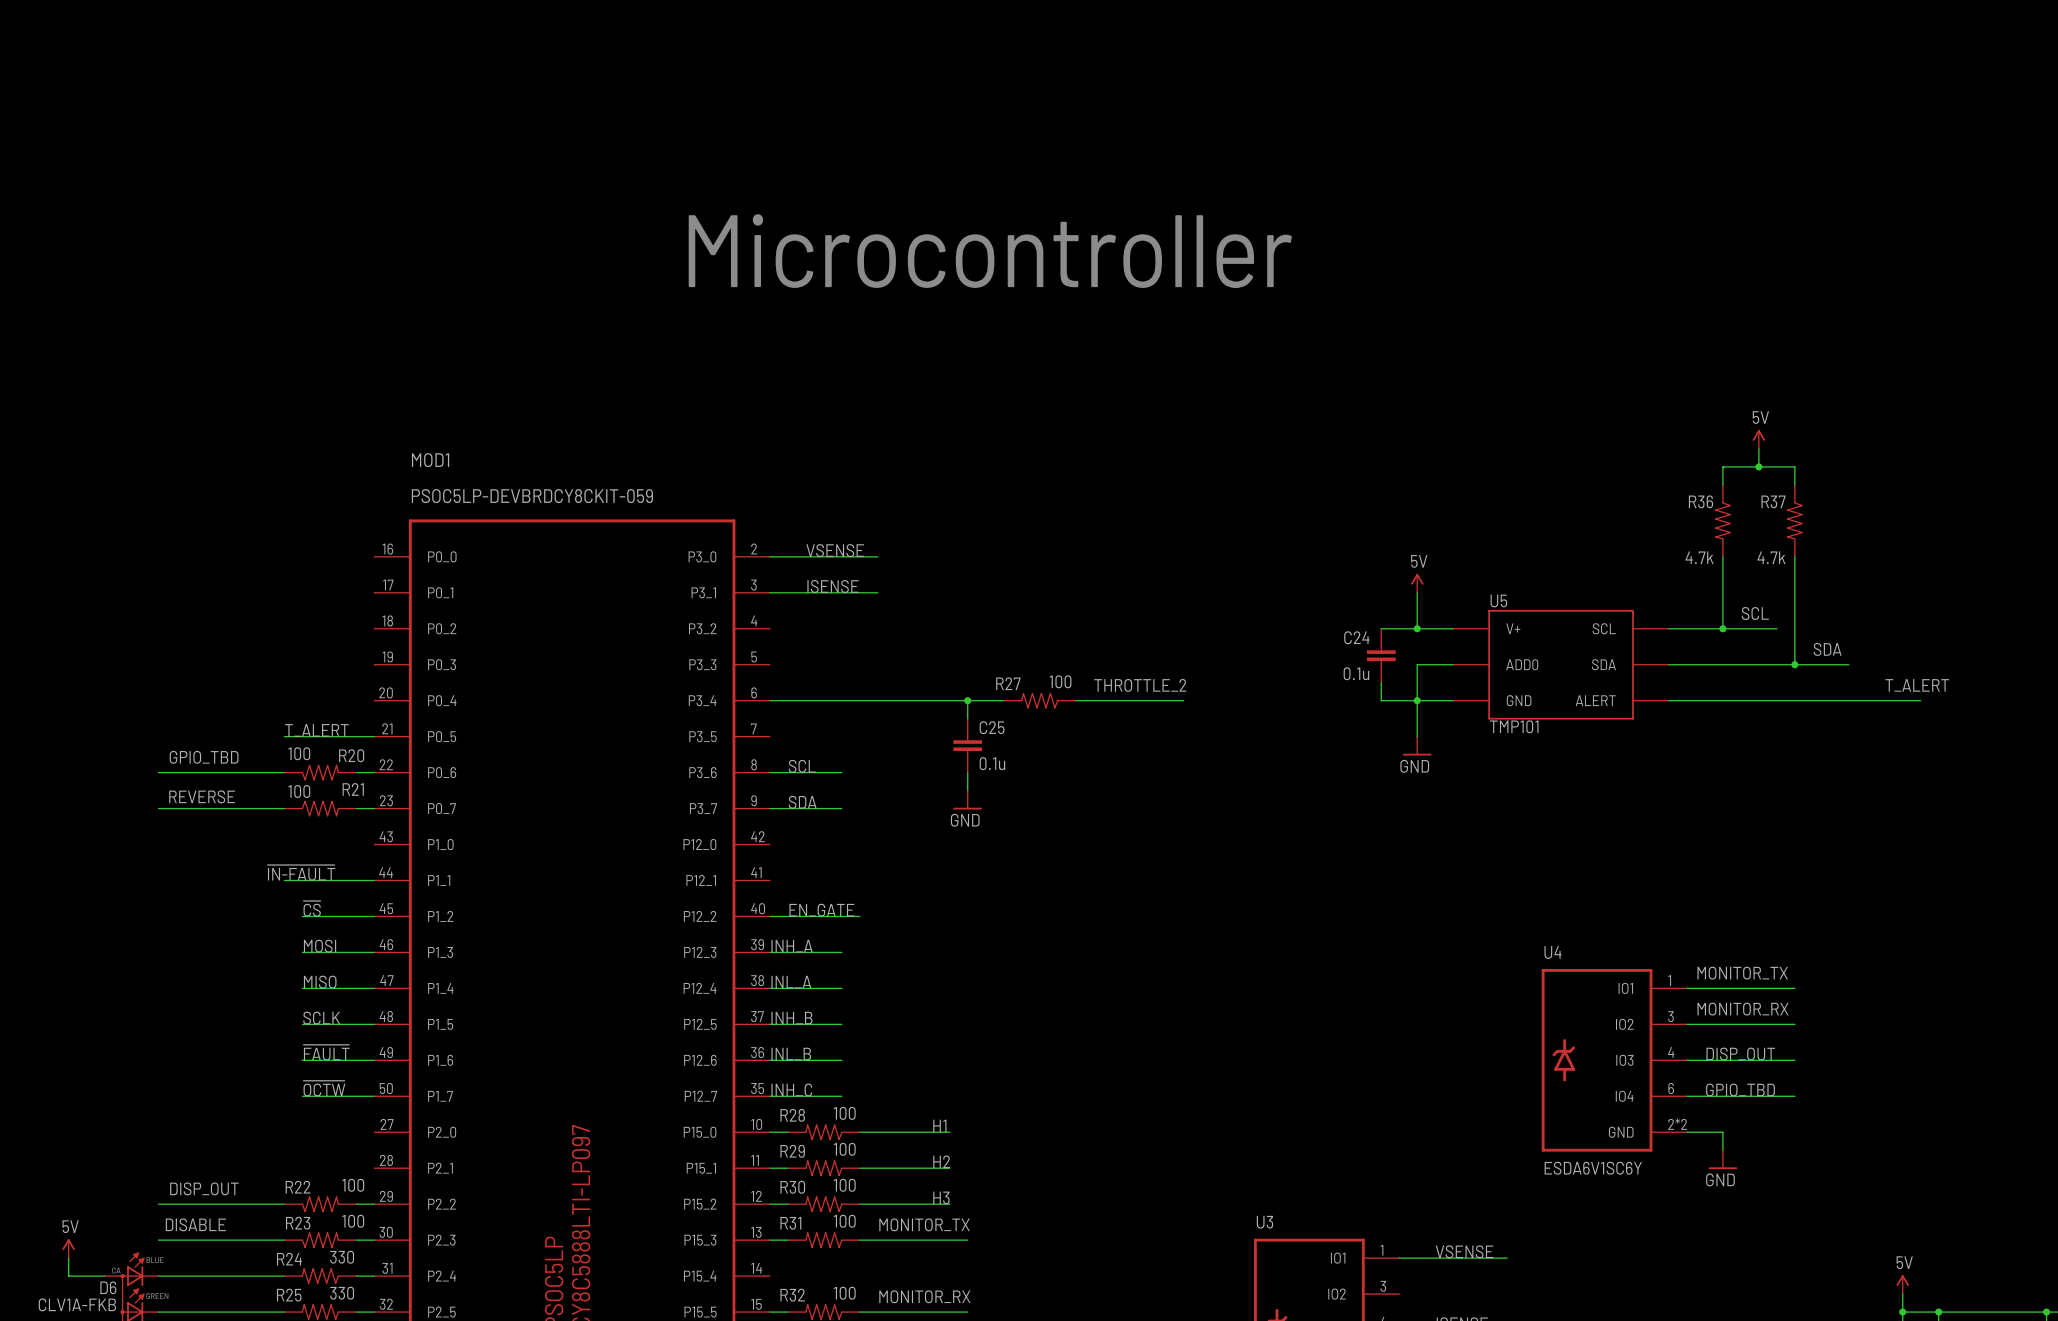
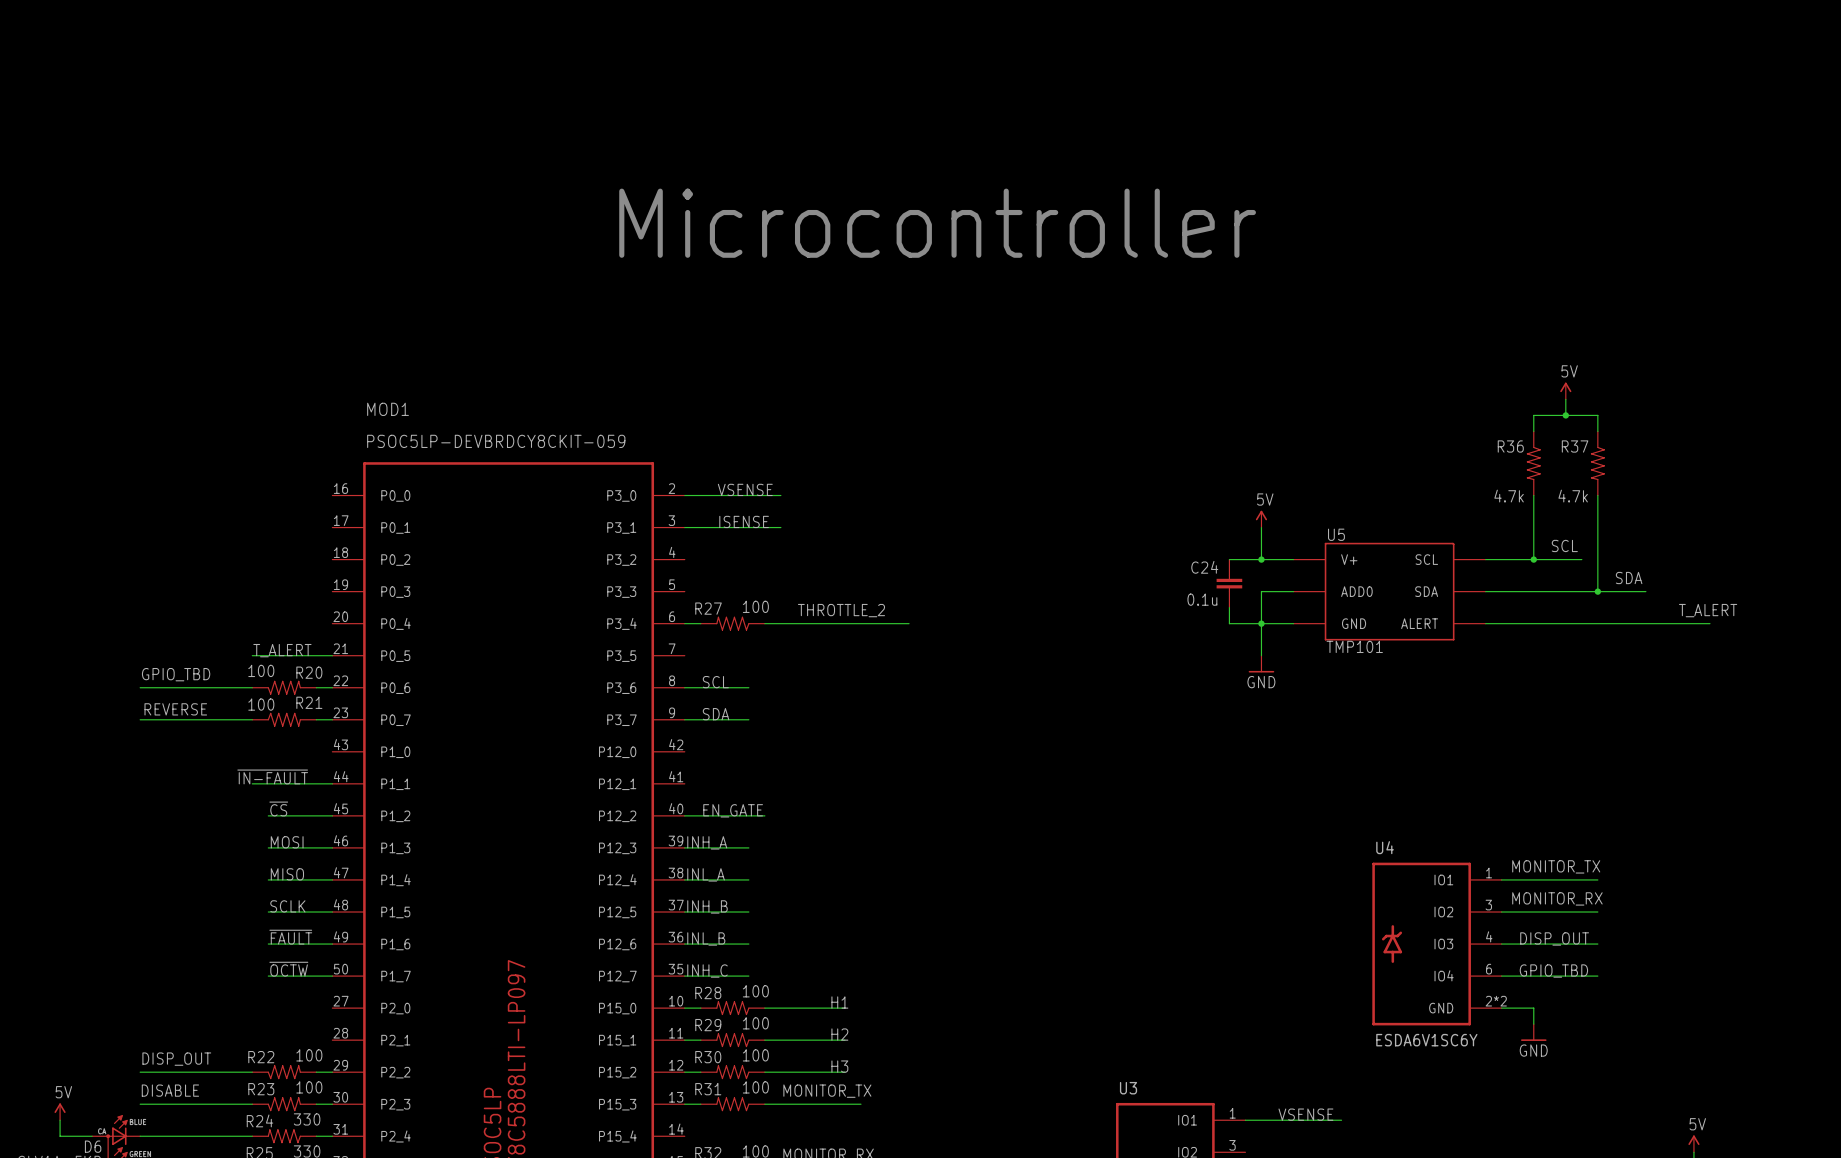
label: none -> THROTTLE_2 (841, 610)
label: THROTTLE_2 (1140, 685) -> none
wire: (967, 700) (967, 718) -> none
junction: (967, 700) -> none
R27 position: (1039, 700) -> (732, 623)
wire: (1075, 700) (1183, 700) -> none
C25: 0.1u (967, 745) -> none
wire: (967, 772) (967, 790) -> none
power symbol: GND (967, 800) -> none

